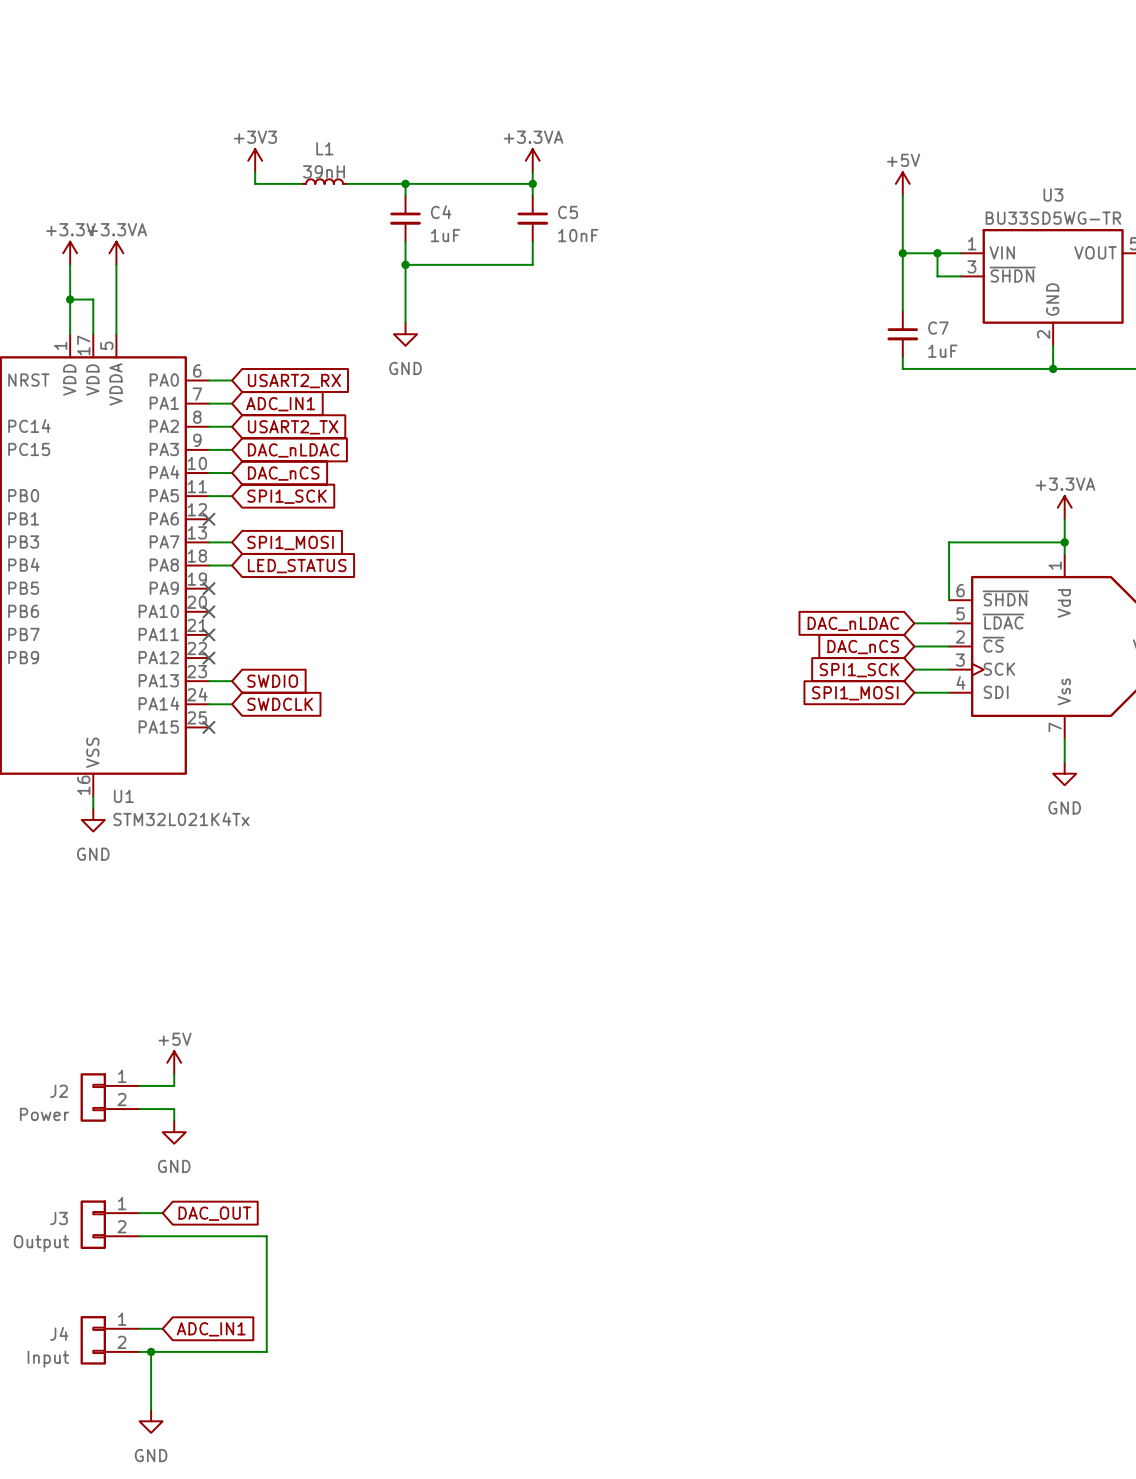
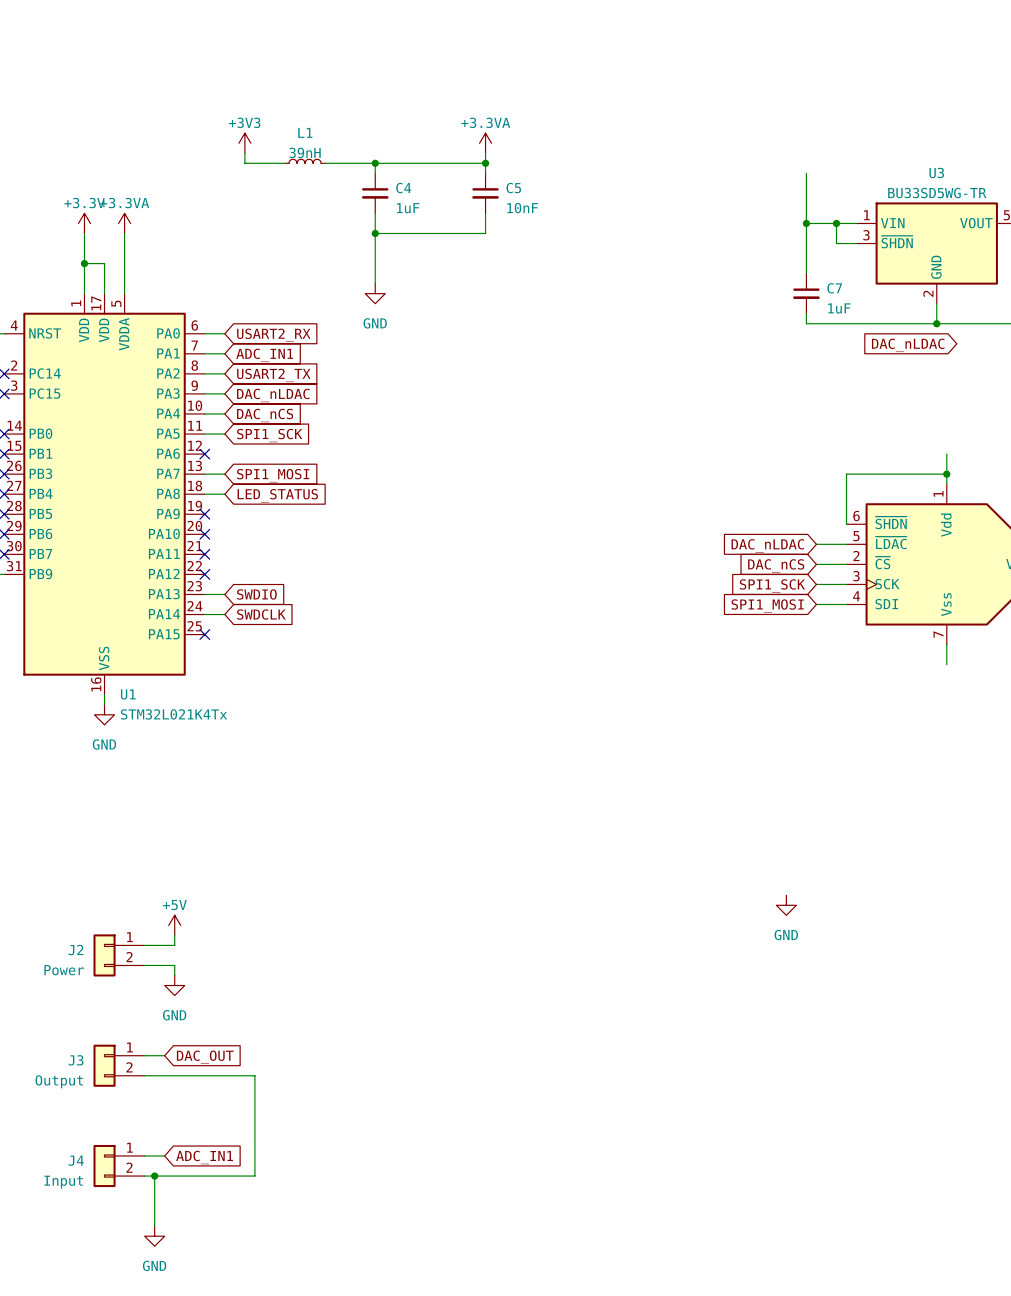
power symbol: +5V (902, 183) -> none
global label: none -> DAC_nLDAC (908, 345)
power symbol: +3.3VA (1064, 507) -> none
power symbol: GND (1064, 773) -> none
power symbol: none -> GND (786, 905)

